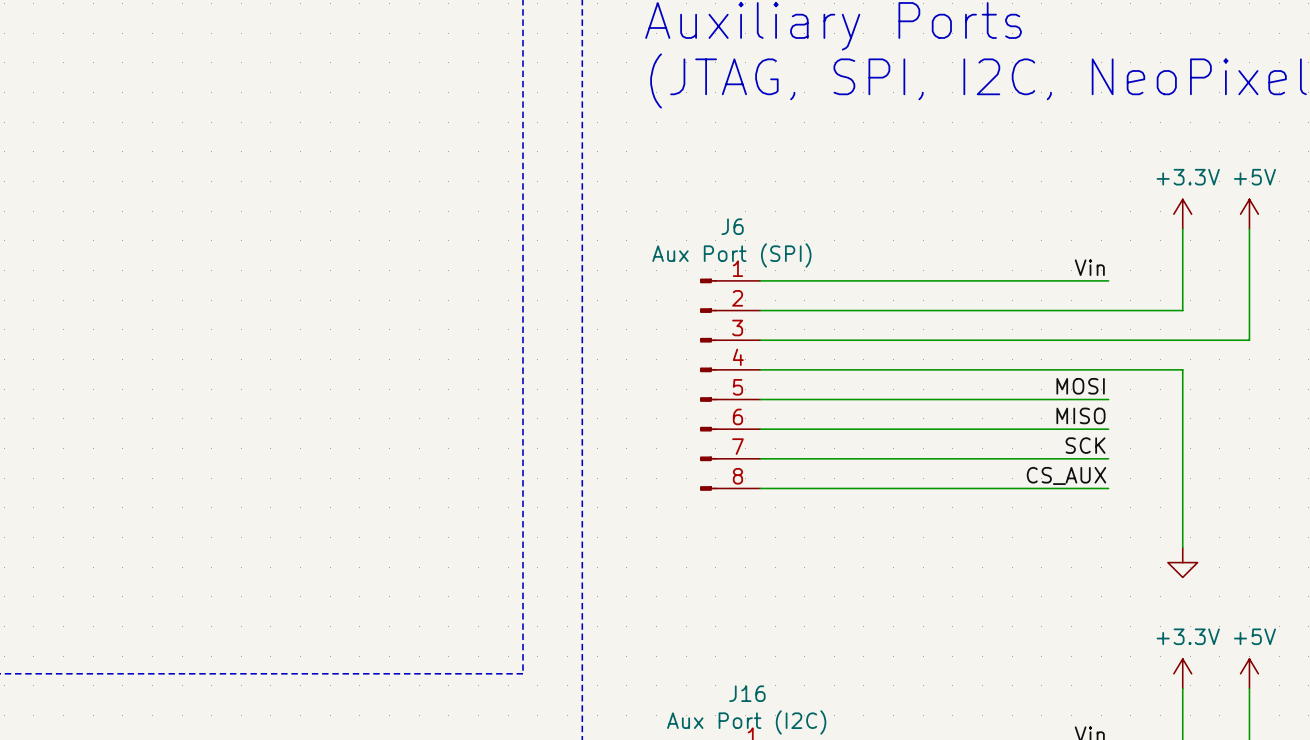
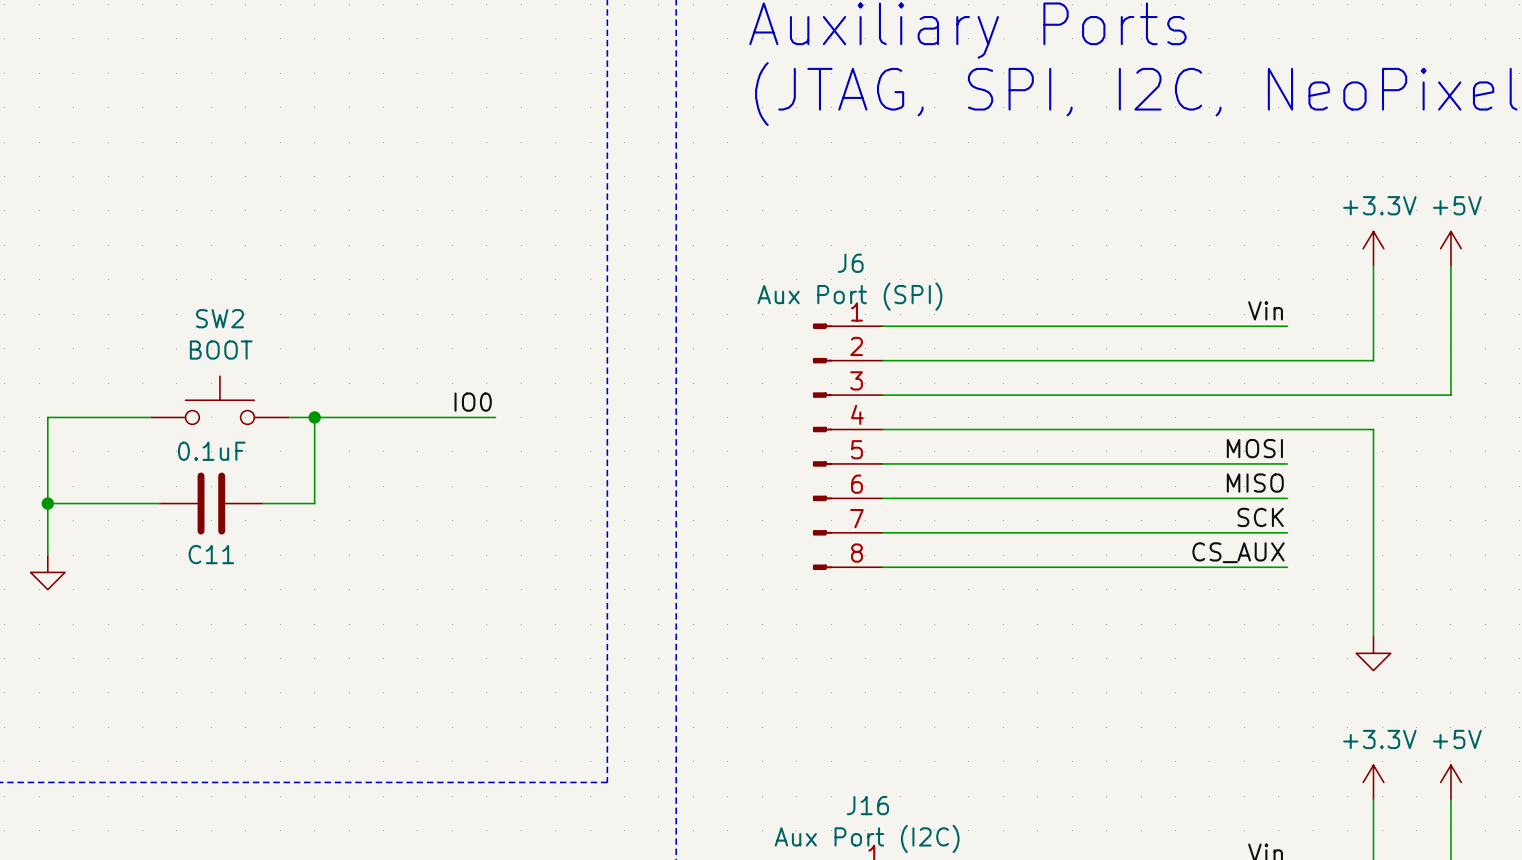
SW2: none -> BOOT (219, 400)
label: none -> IO0 (473, 402)
wire: none -> (151, 417) (47, 417) (47, 555)
wire: none -> (288, 417) (495, 417)
wire: none -> (314, 417) (314, 503) (263, 503)
junction: none -> (314, 417)
wire: none -> (47, 503) (159, 503)
junction: none -> (47, 503)
C11: none -> 0.1uF (211, 503)
power symbol: none -> (47, 572)

